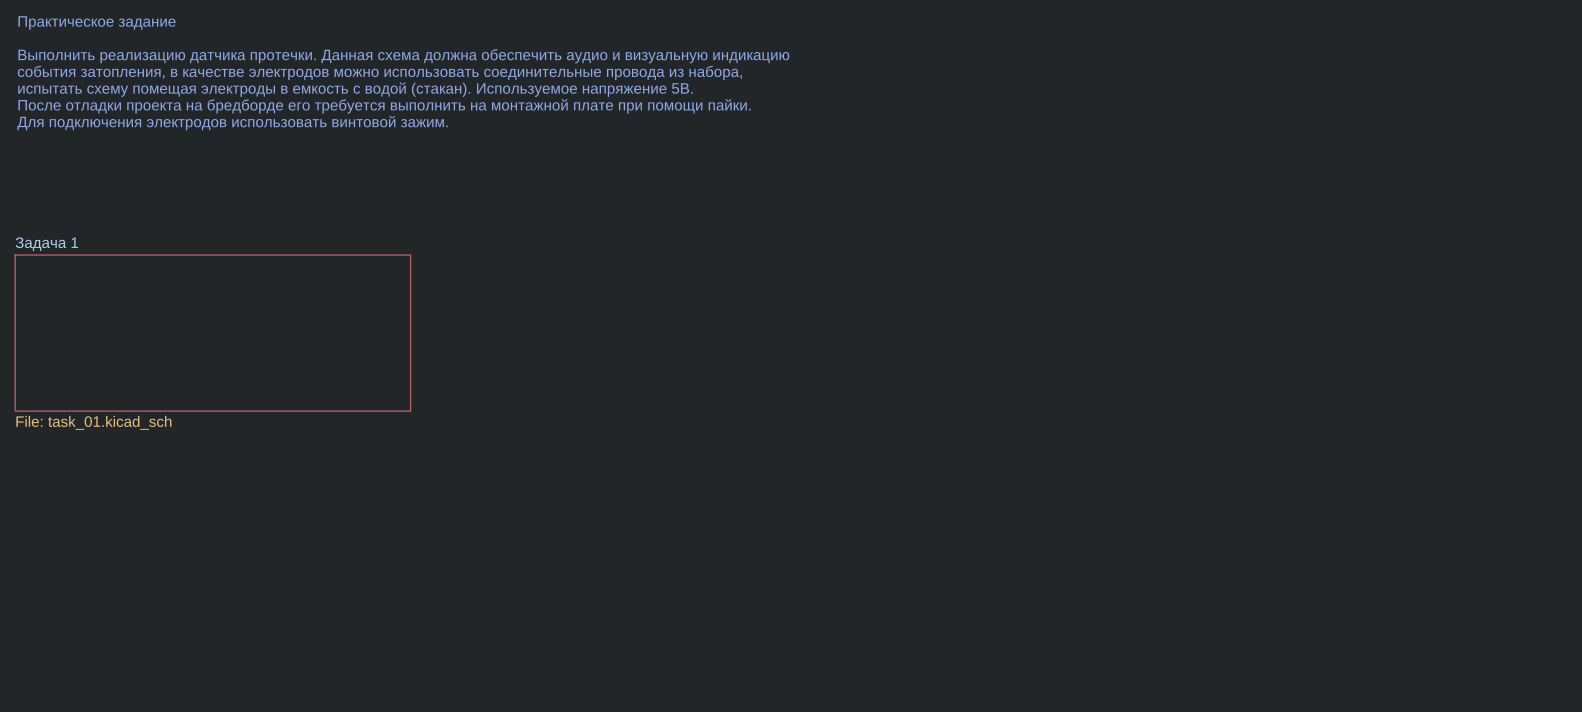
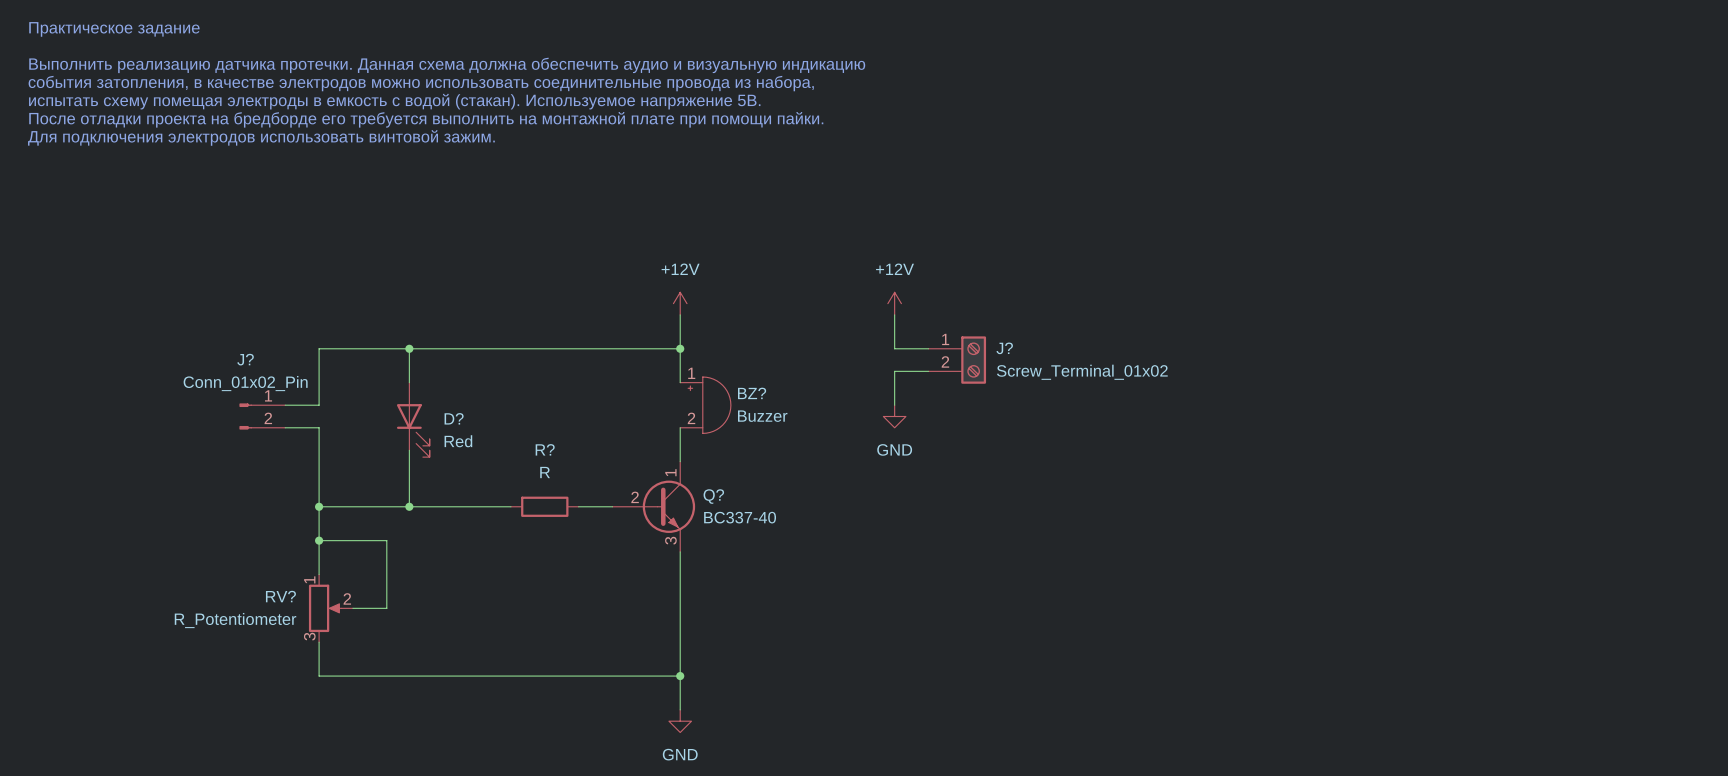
power symbol: none -> +12V (680, 303)
power symbol: none -> +12V (894, 303)
wire: none -> (680, 314) (680, 382)
wire: none -> (894, 314) (894, 348) (928, 348)
wire: none -> (409, 348) (409, 382)
junction: none -> (409, 348)
wire: none -> (680, 348) (319, 348) (319, 405) (285, 405)
junction: none -> (680, 348)
J?: none -> Screw_Terminal_01x02 (957, 360)
sheet Задача 1: File: task_01.kicad_sch (212, 333) -> none
wire: none -> (928, 371) (894, 371) (894, 405)
BZ?: none -> Buzzer (705, 405)
J?: none -> Conn_01x02_Pin (262, 416)
power symbol: none -> GND (894, 416)
D?: none -> Red (413, 419)
wire: none -> (285, 427) (319, 427) (319, 574)
wire: none -> (680, 427) (680, 461)
wire: none -> (409, 450) (409, 506)
wire: none -> (319, 506) (510, 506)
junction: none -> (319, 506)
junction: none -> (409, 506)
R?: none -> R (544, 506)
wire: none -> (578, 506) (612, 506)
Q?: none -> BC337-40 (653, 506)
wire: none -> (319, 540) (386, 540) (386, 608) (352, 608)
junction: none -> (319, 540)
wire: none -> (680, 551) (680, 709)
RV?: none -> R_Potentiometer (330, 608)
wire: none -> (319, 642) (319, 676) (680, 676)
junction: none -> (680, 676)
power symbol: none -> GND (680, 721)

